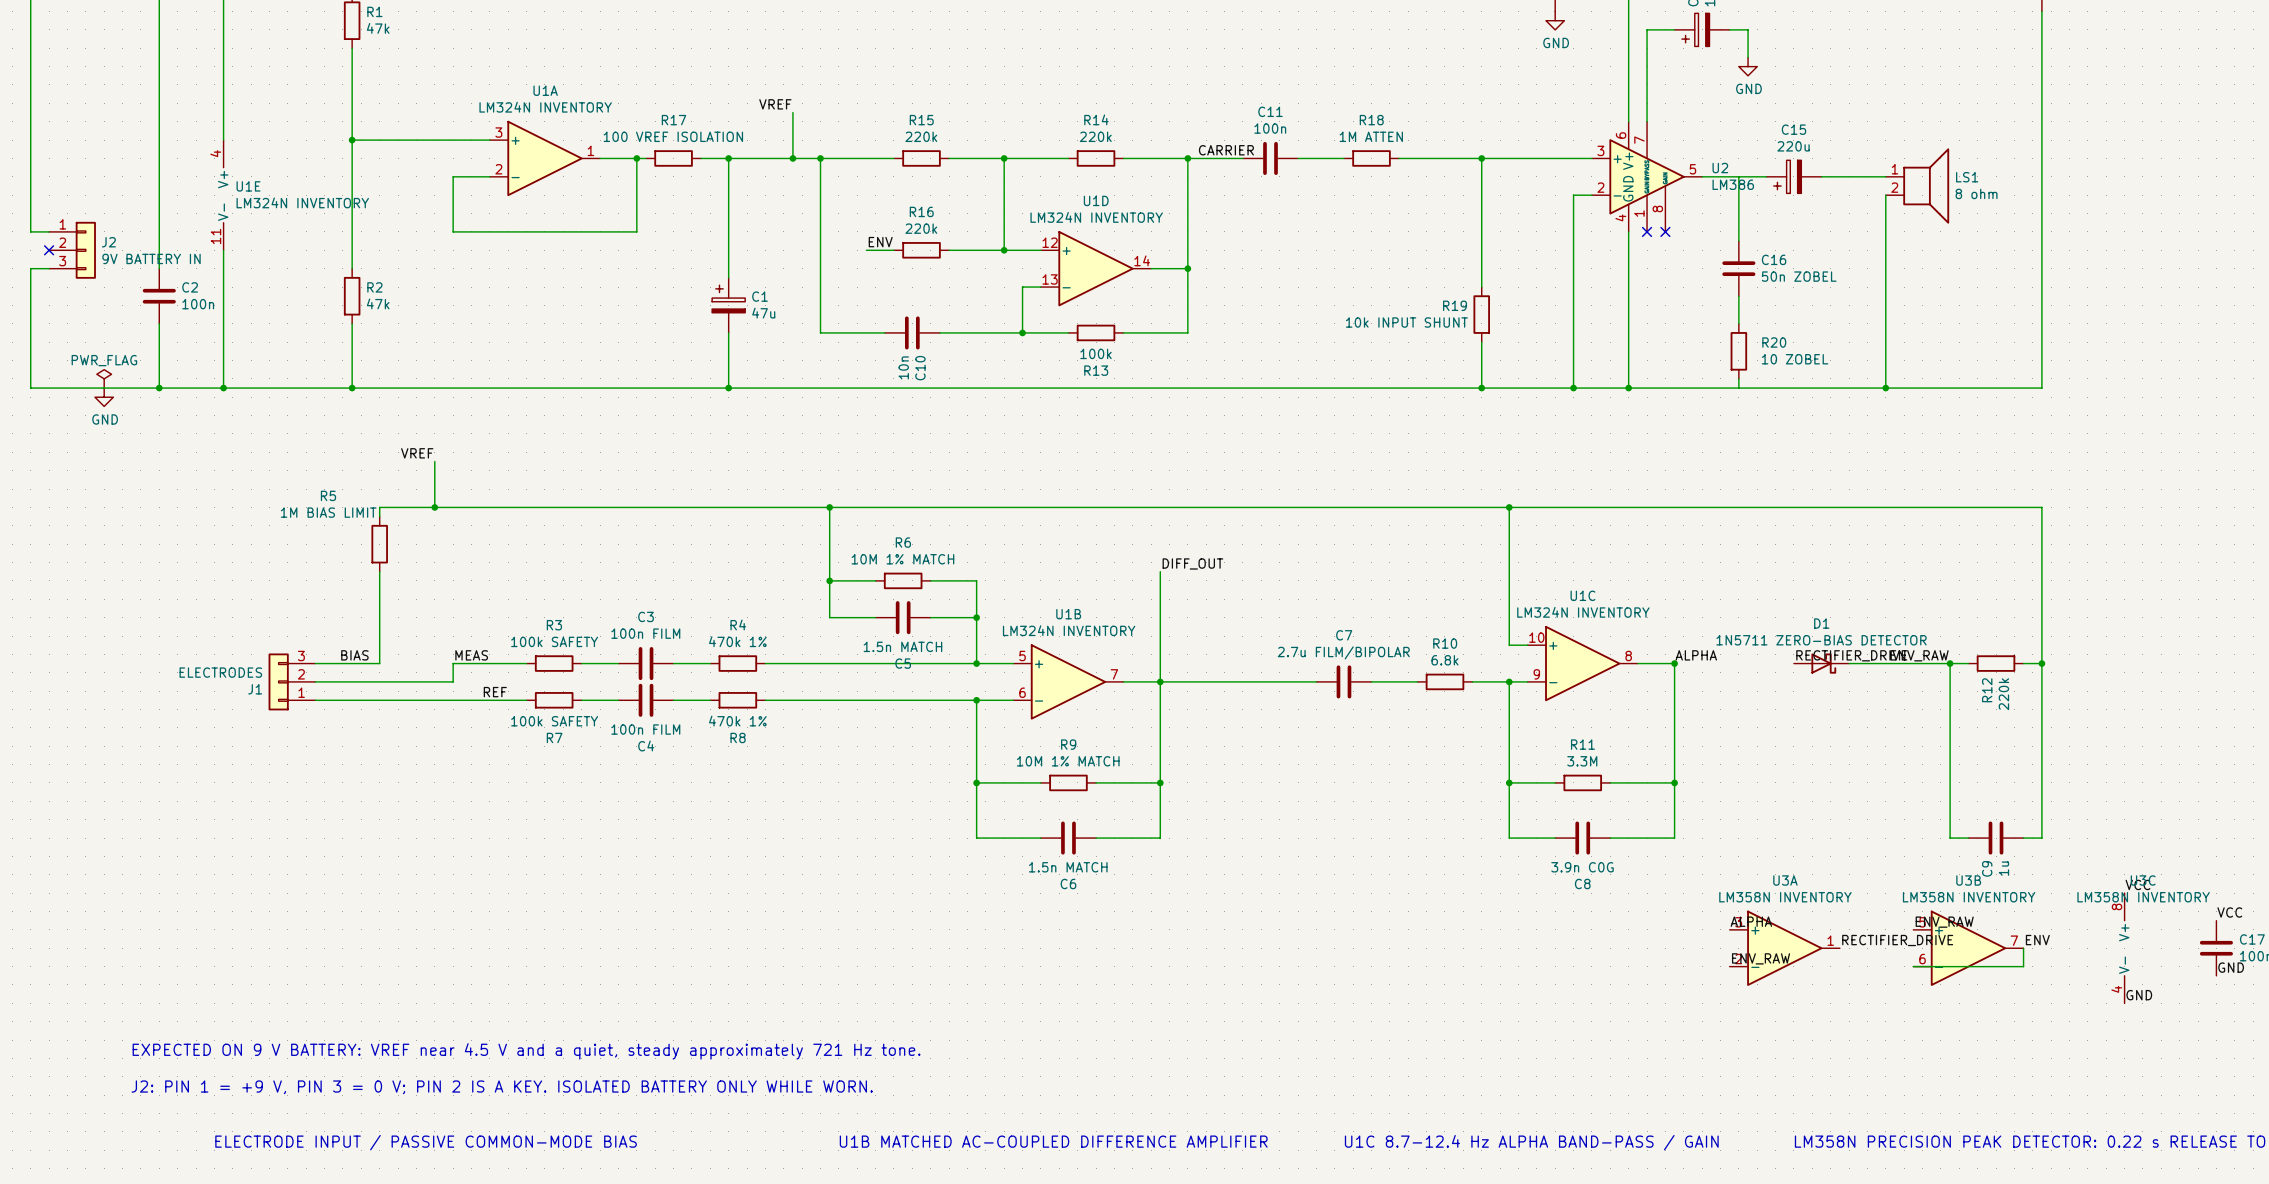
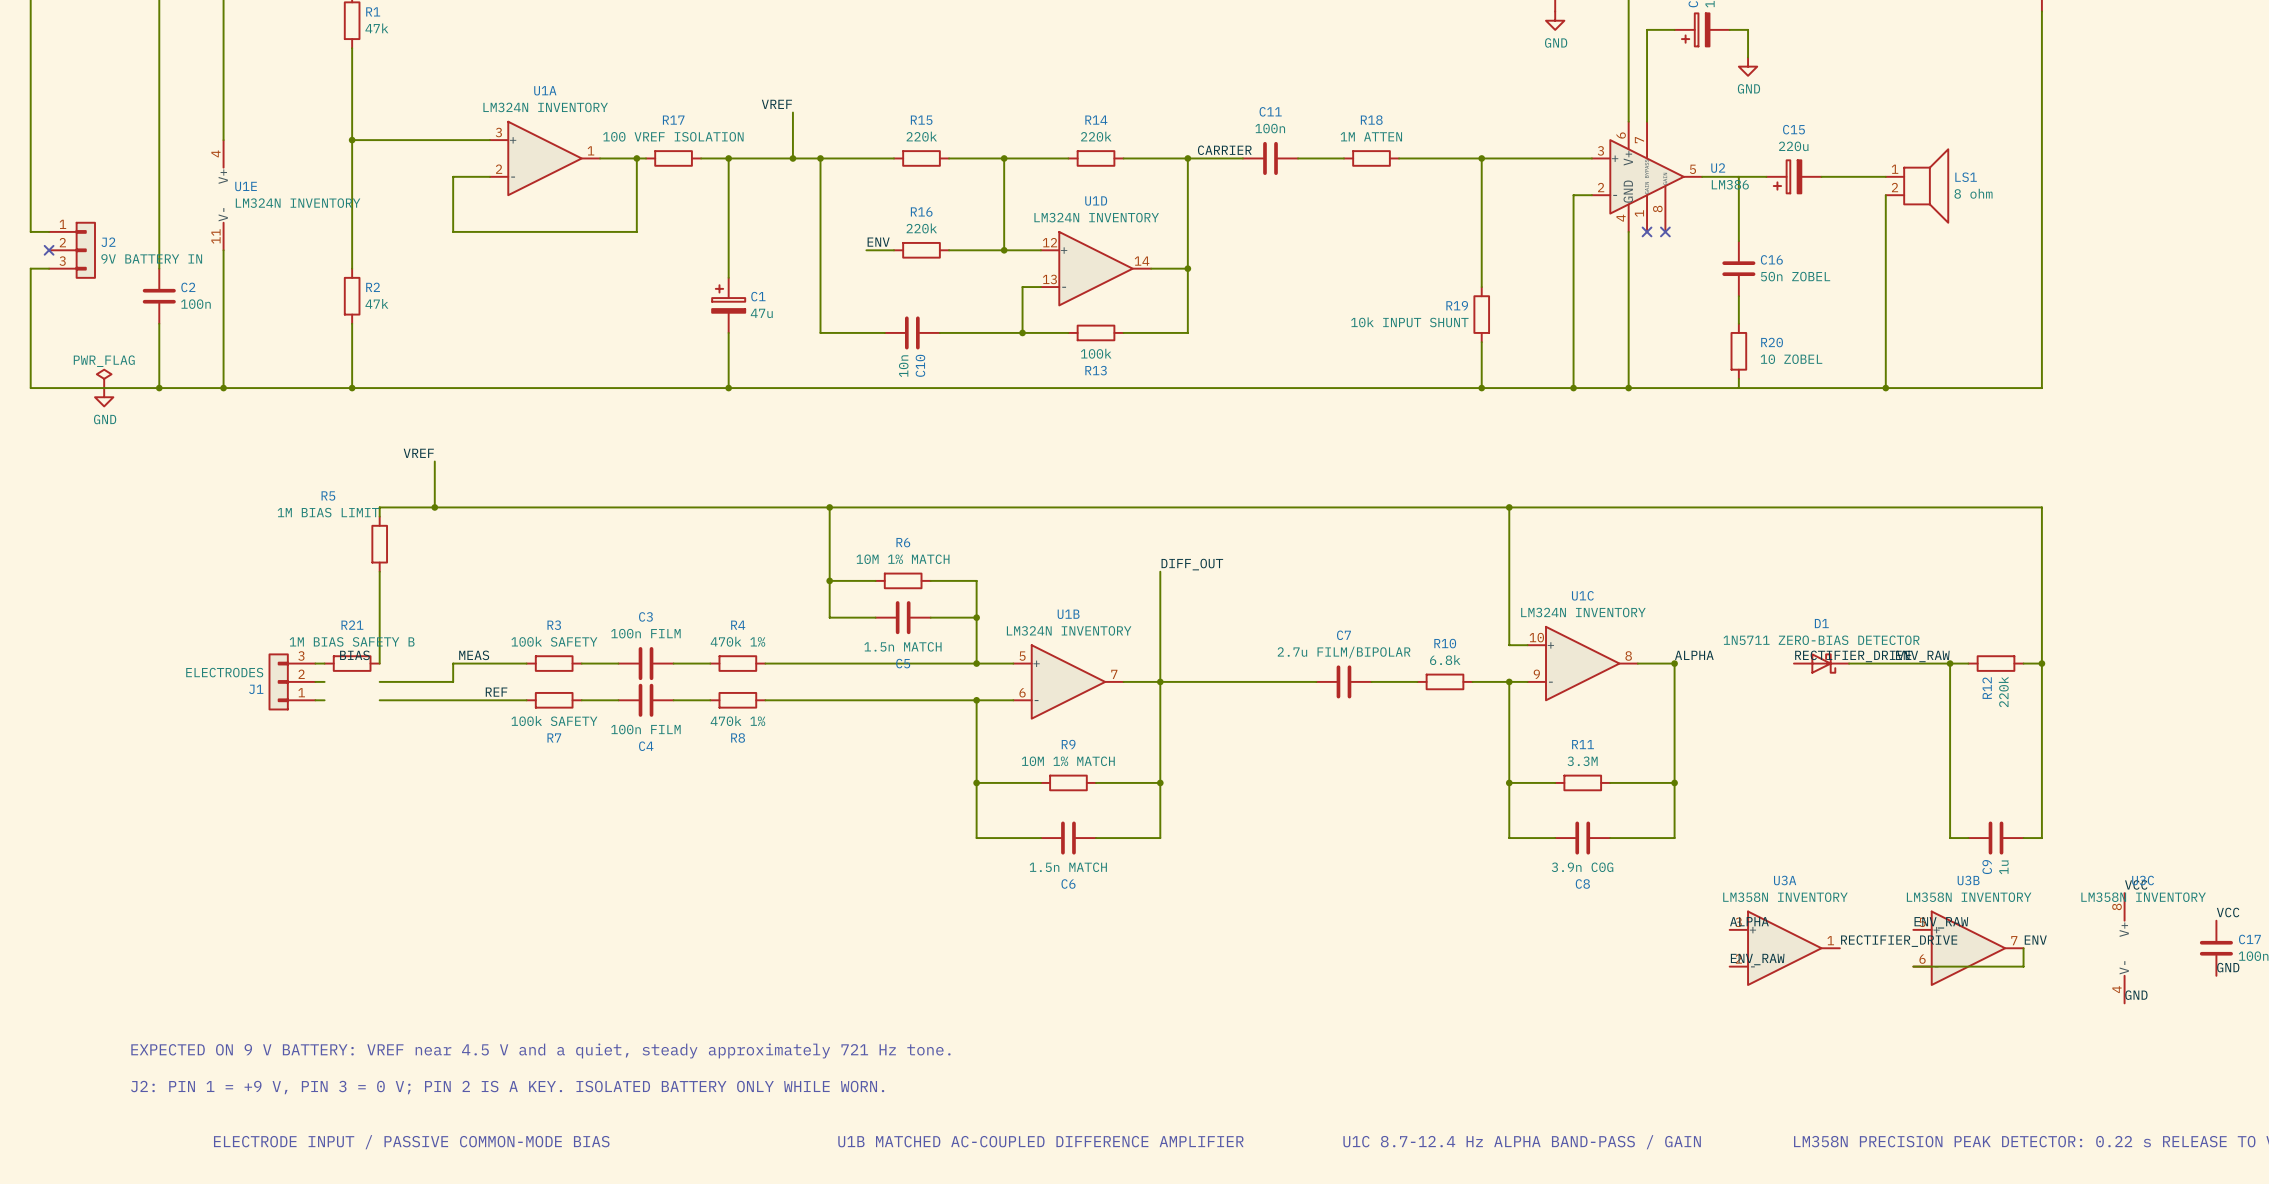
wire: (324, 663) (379, 663) -> none
R21: none -> 1M BIAS SAFETY B (352, 663)
wire: (324, 681) (379, 681) -> none
wire: (324, 700) (379, 700) -> none

